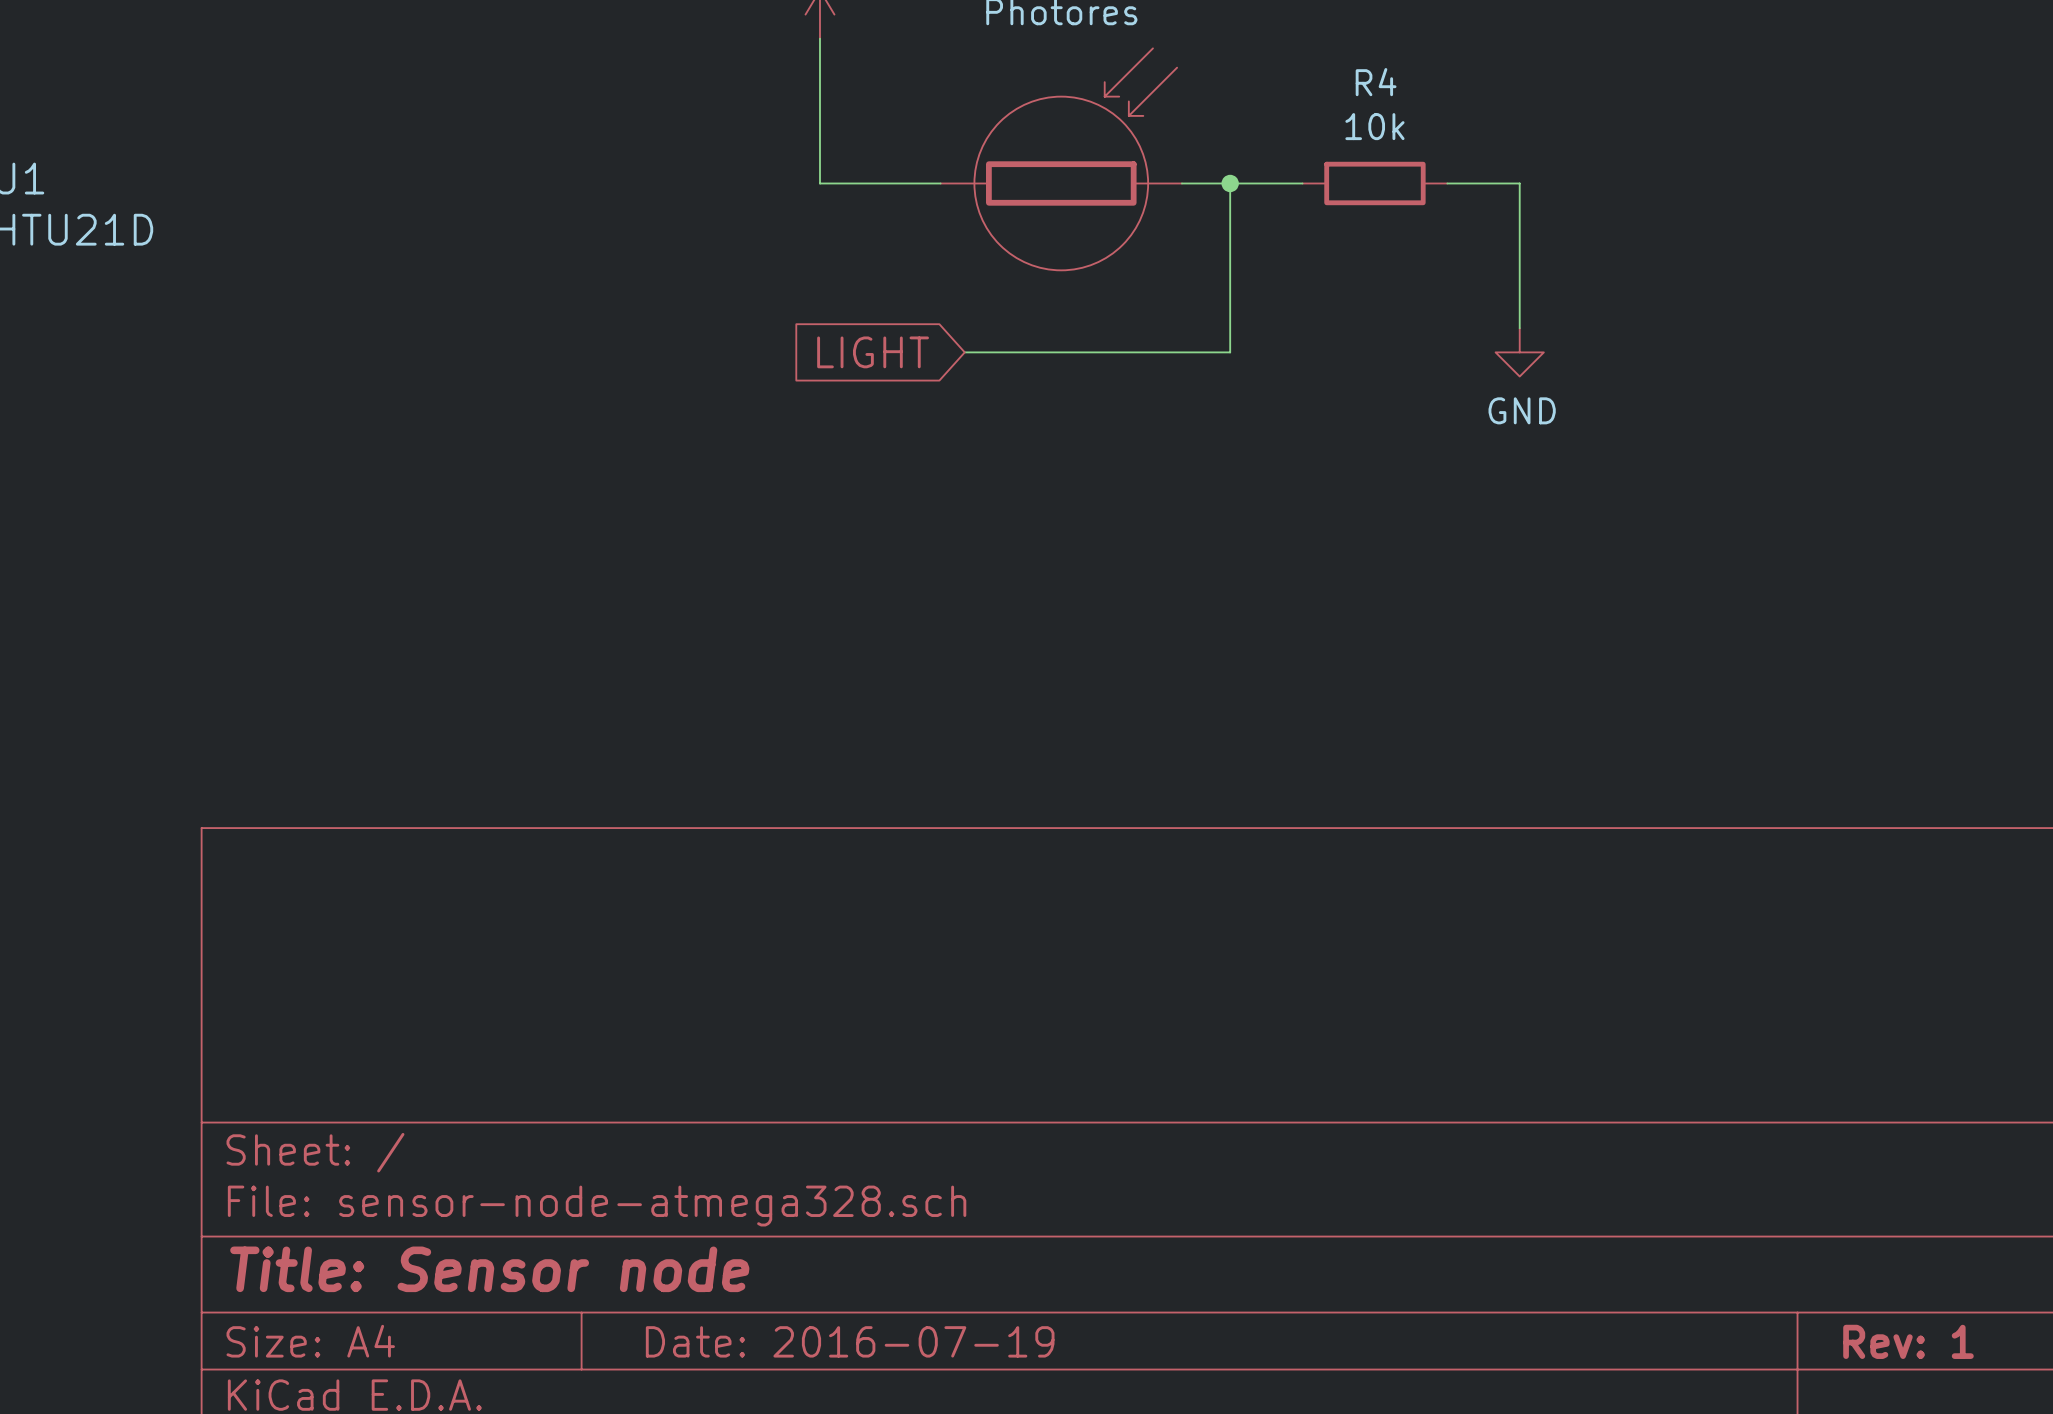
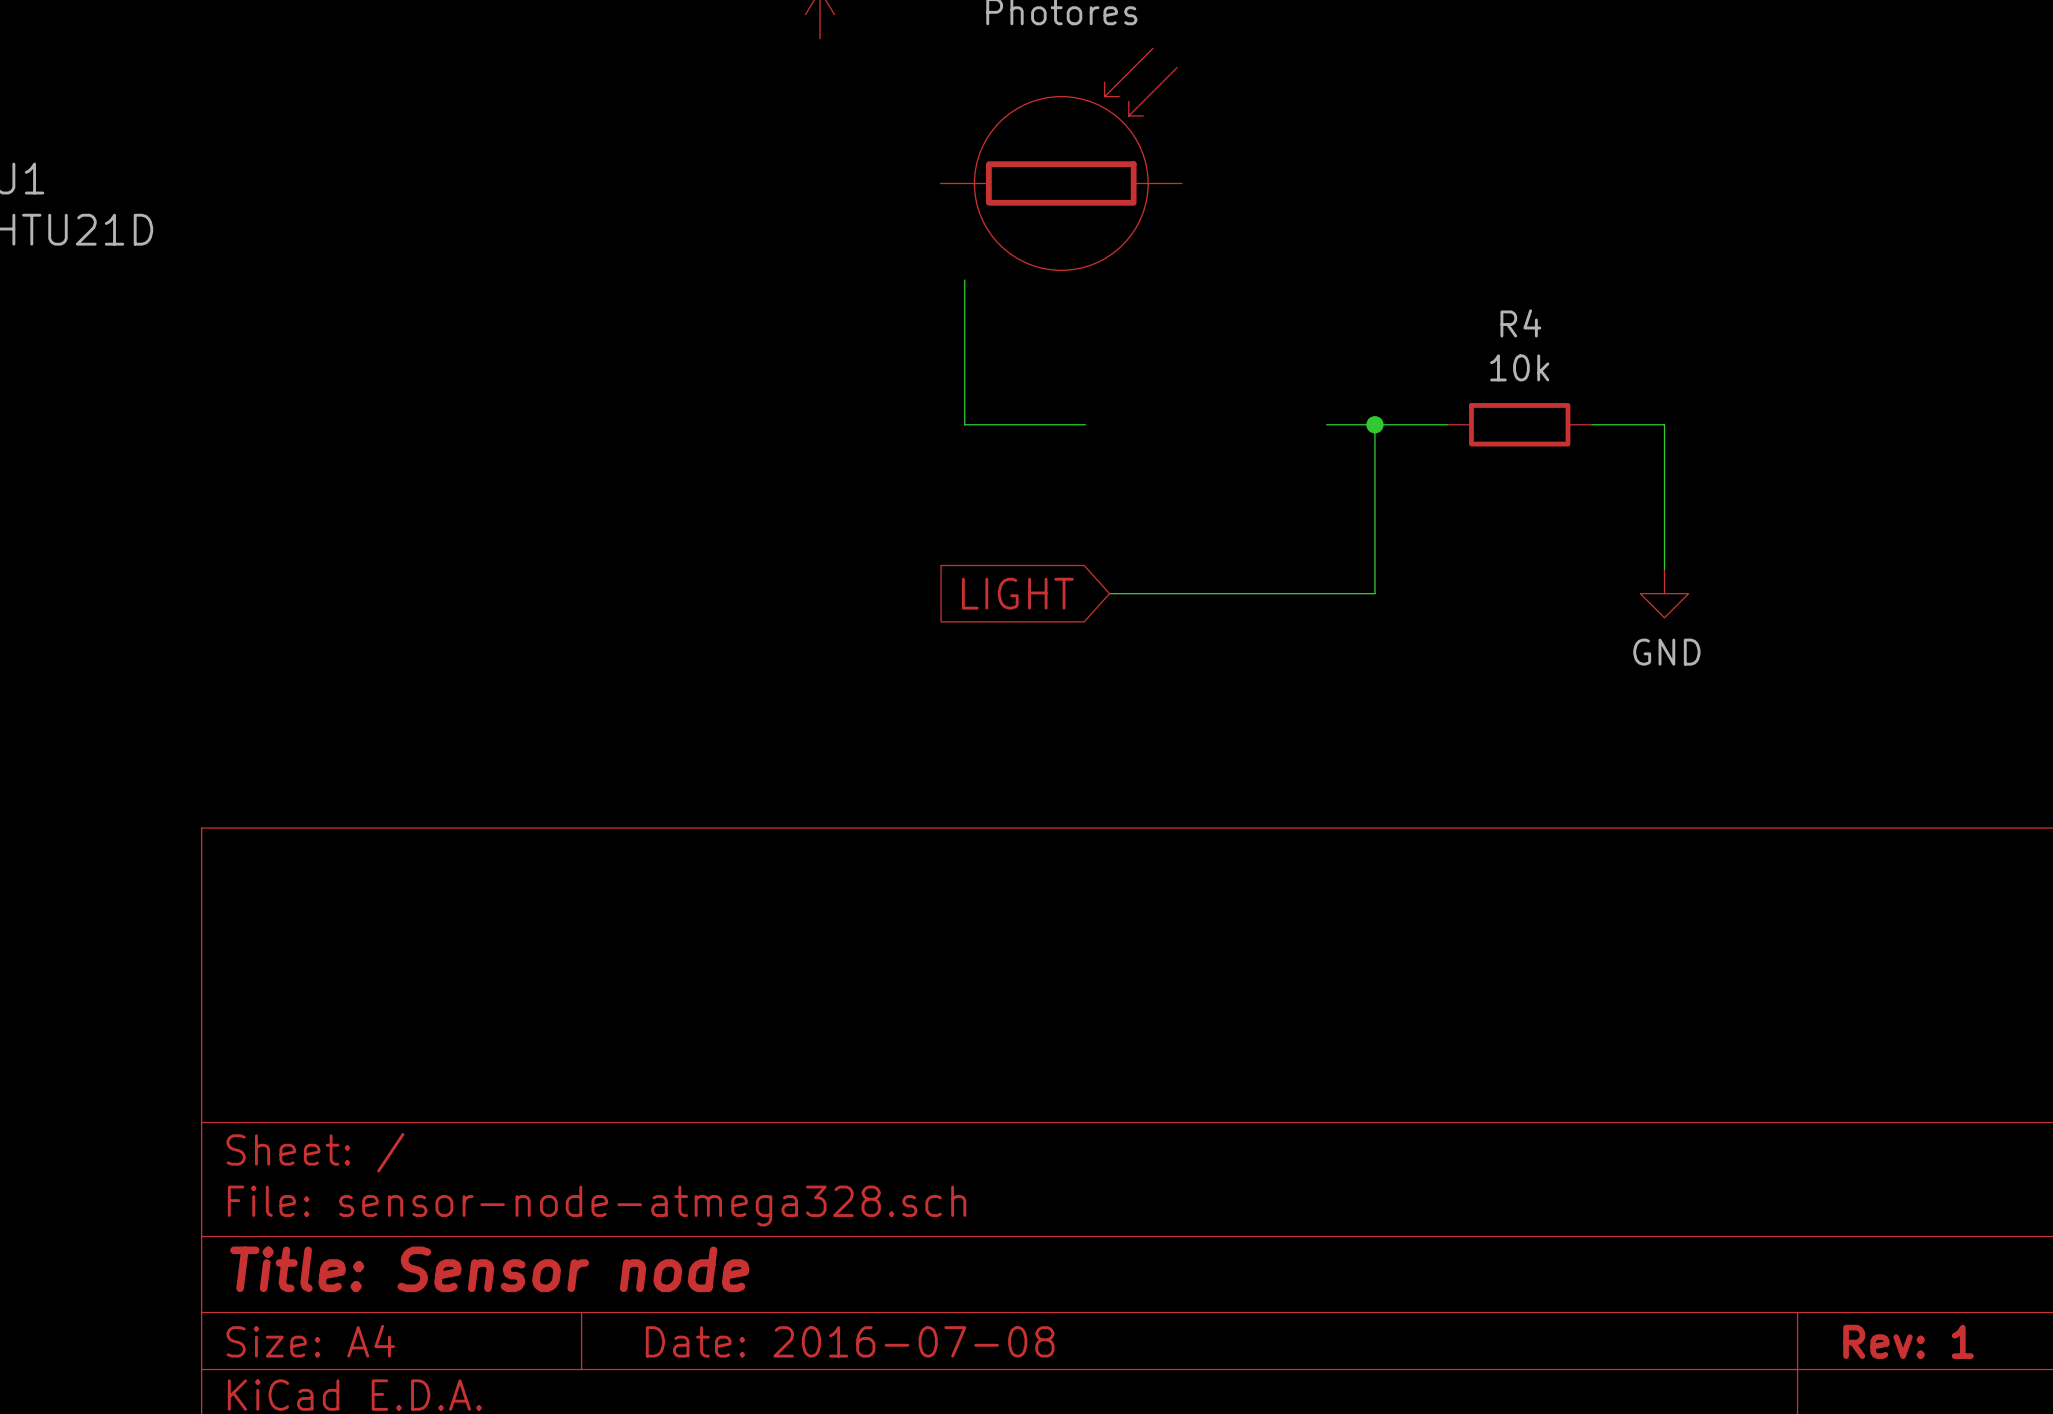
wire: (819, 38) (819, 183) (940, 183) -> (964, 280) (964, 424) (1085, 424)
wire: (1181, 183) (1302, 183) -> (1326, 424) (1447, 424)
wire: (1230, 183) (1230, 352) (964, 352) -> (1374, 424) (1374, 593) (1109, 593)
junction: (1230, 183) -> none
R4 position: (1374, 183) -> (1519, 424)
wire: (1447, 183) (1519, 183) (1519, 328) -> (1592, 424) (1664, 424) (1664, 569)
global label position: LIGHT (873, 352) -> LIGHT (1017, 593)
power symbol position: GND (1519, 352) -> GND (1664, 593)
junction: none -> (1374, 424)
title block: Date: 2016-07-19 (850, 1341) -> Date: 2016-07-08 (850, 1341)

